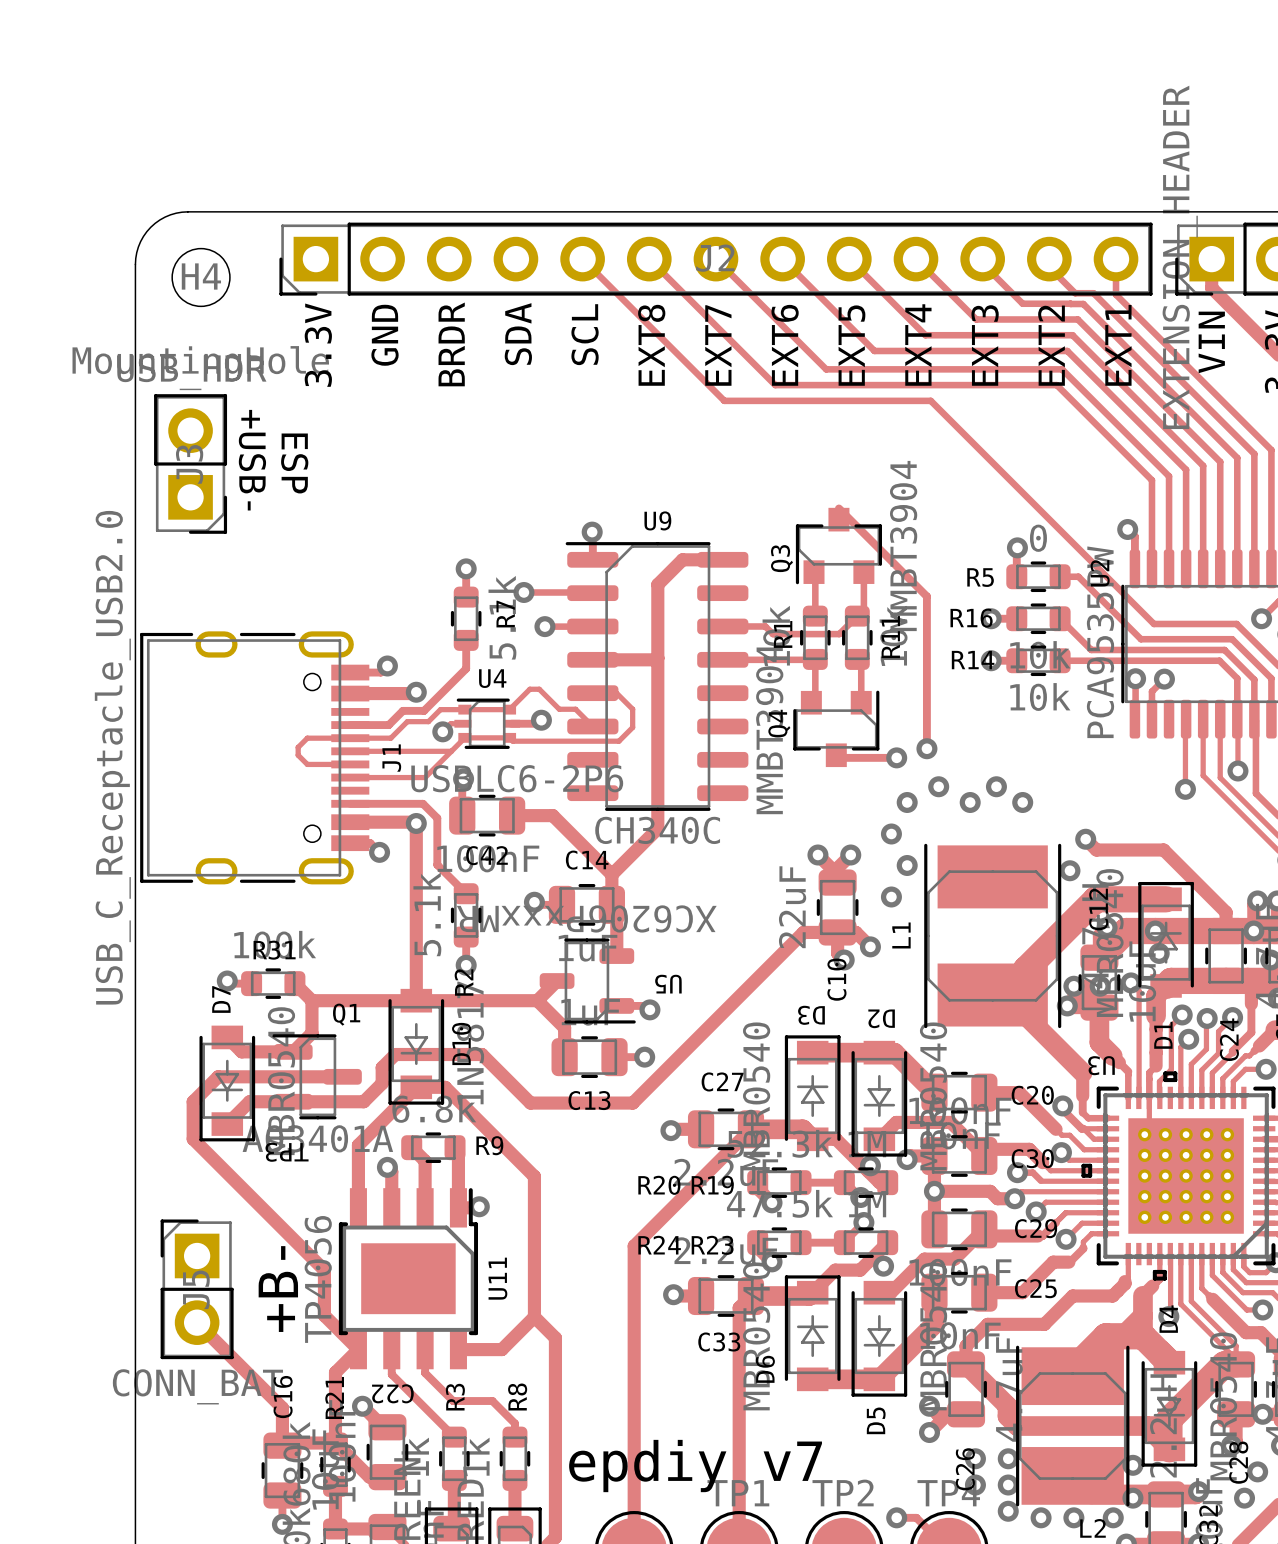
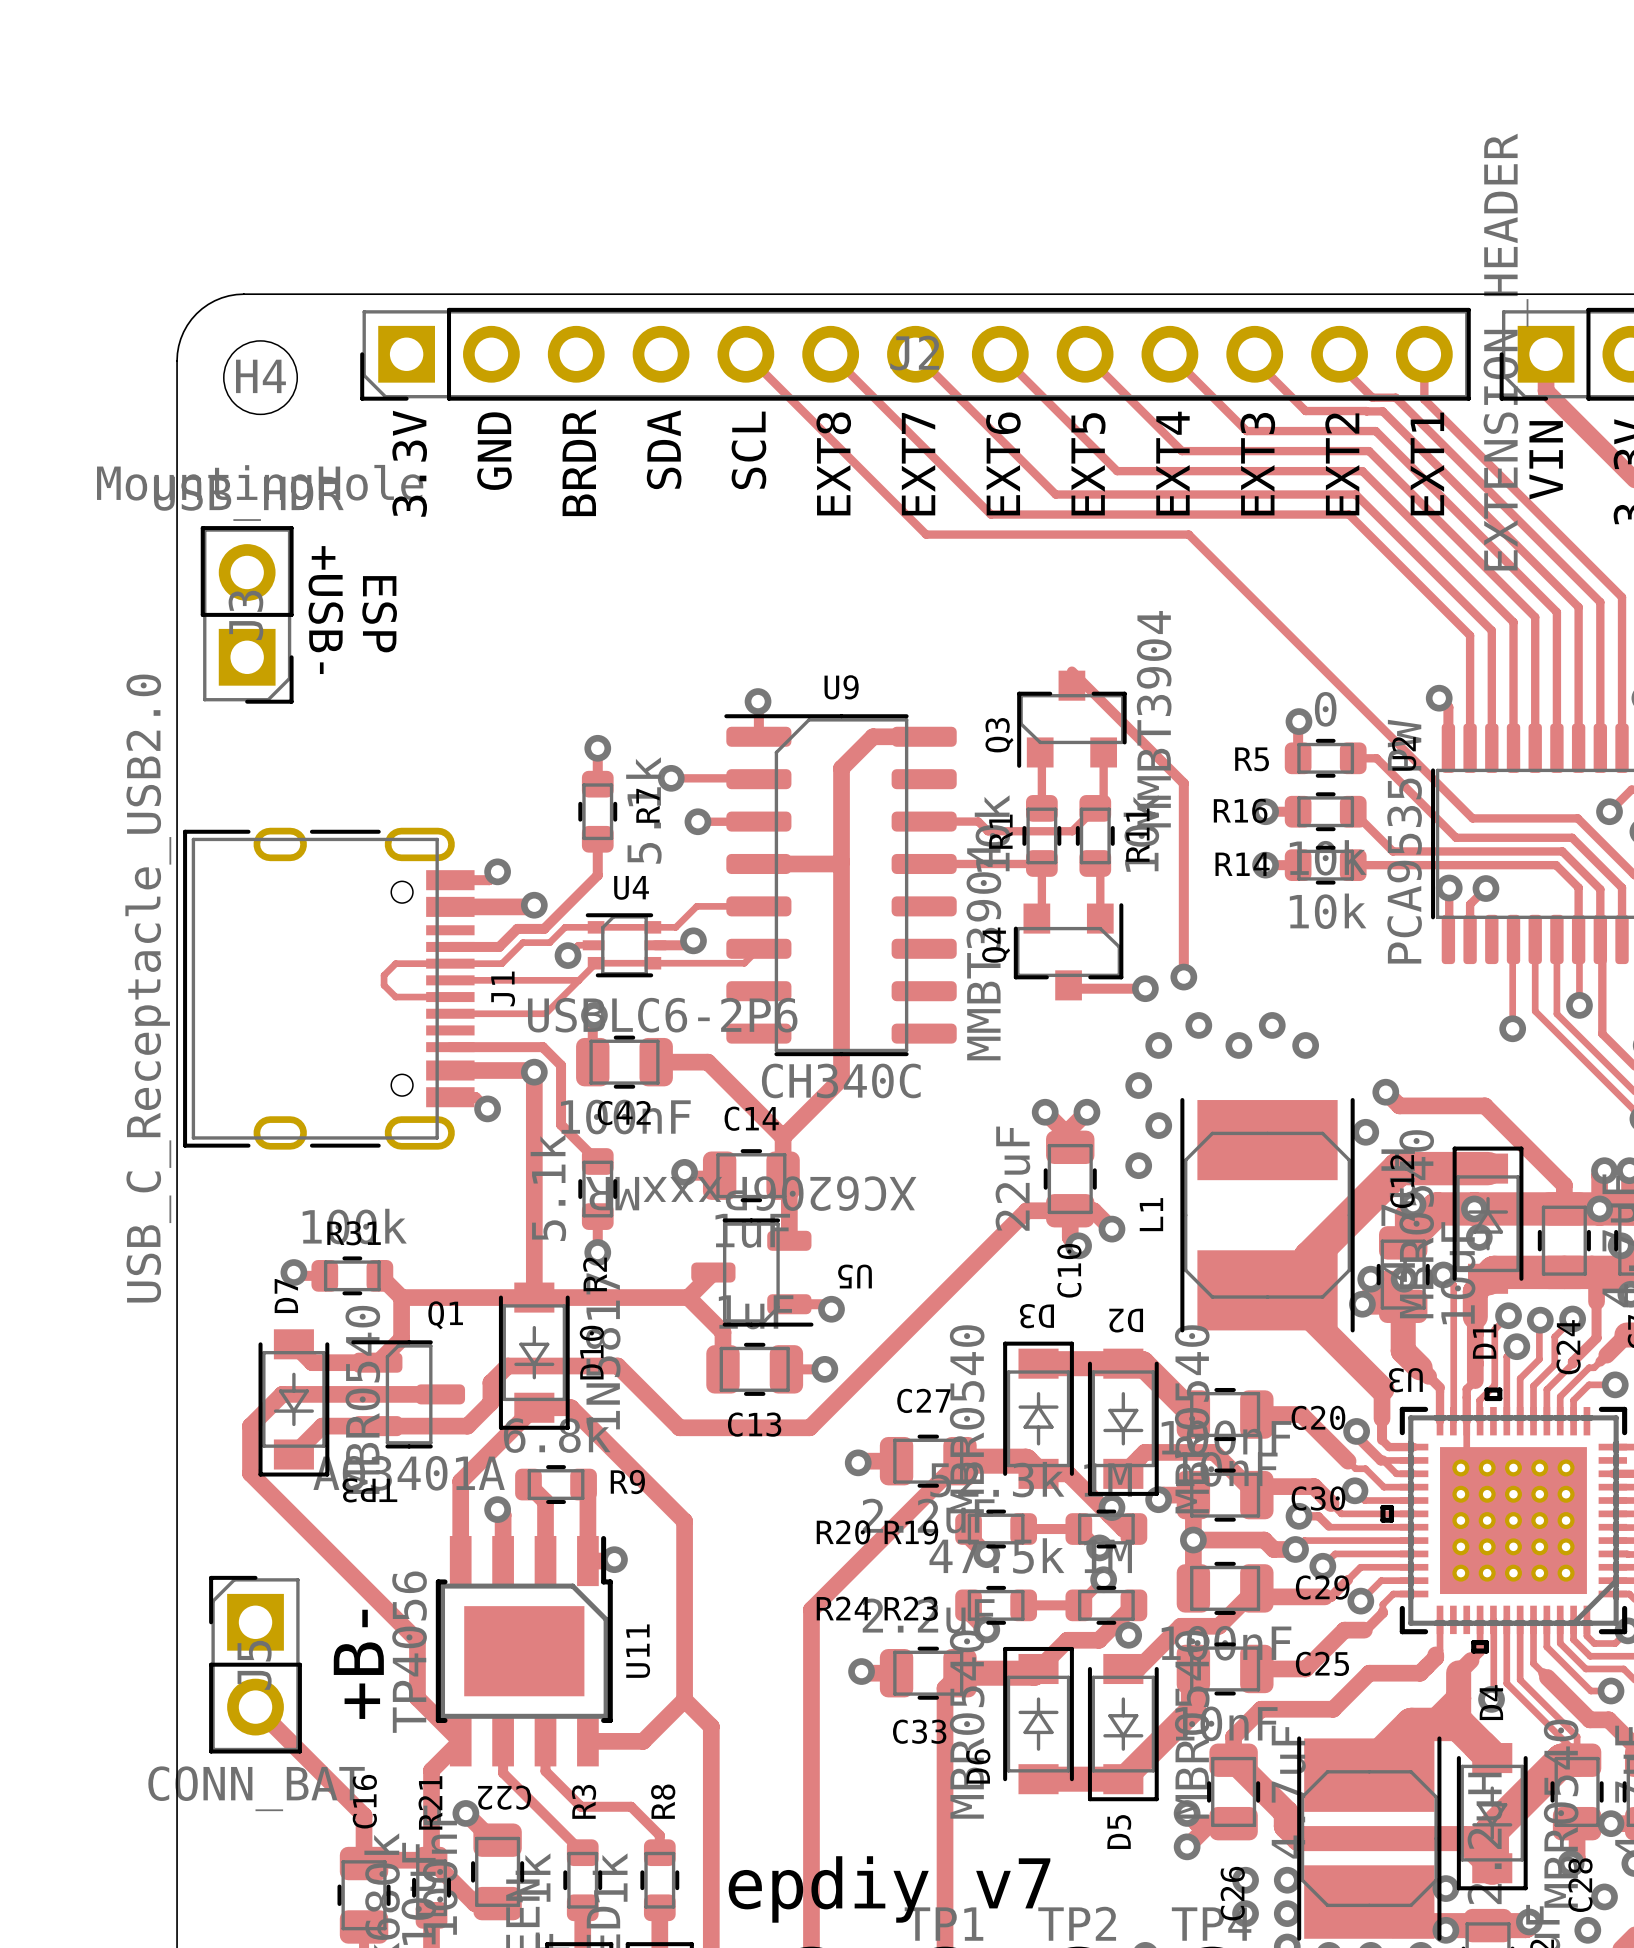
track: (592, 693) (616, 693) (632, 709) (632, 727) (618, 741) (512, 741) (509, 737) -> (758, 906) (696, 906) (675, 927) (652, 927)
track: (509, 709) (529, 689) (539, 689) (559, 709) (575, 709) (592, 726) -> (652, 963) (744, 963) (758, 948)

